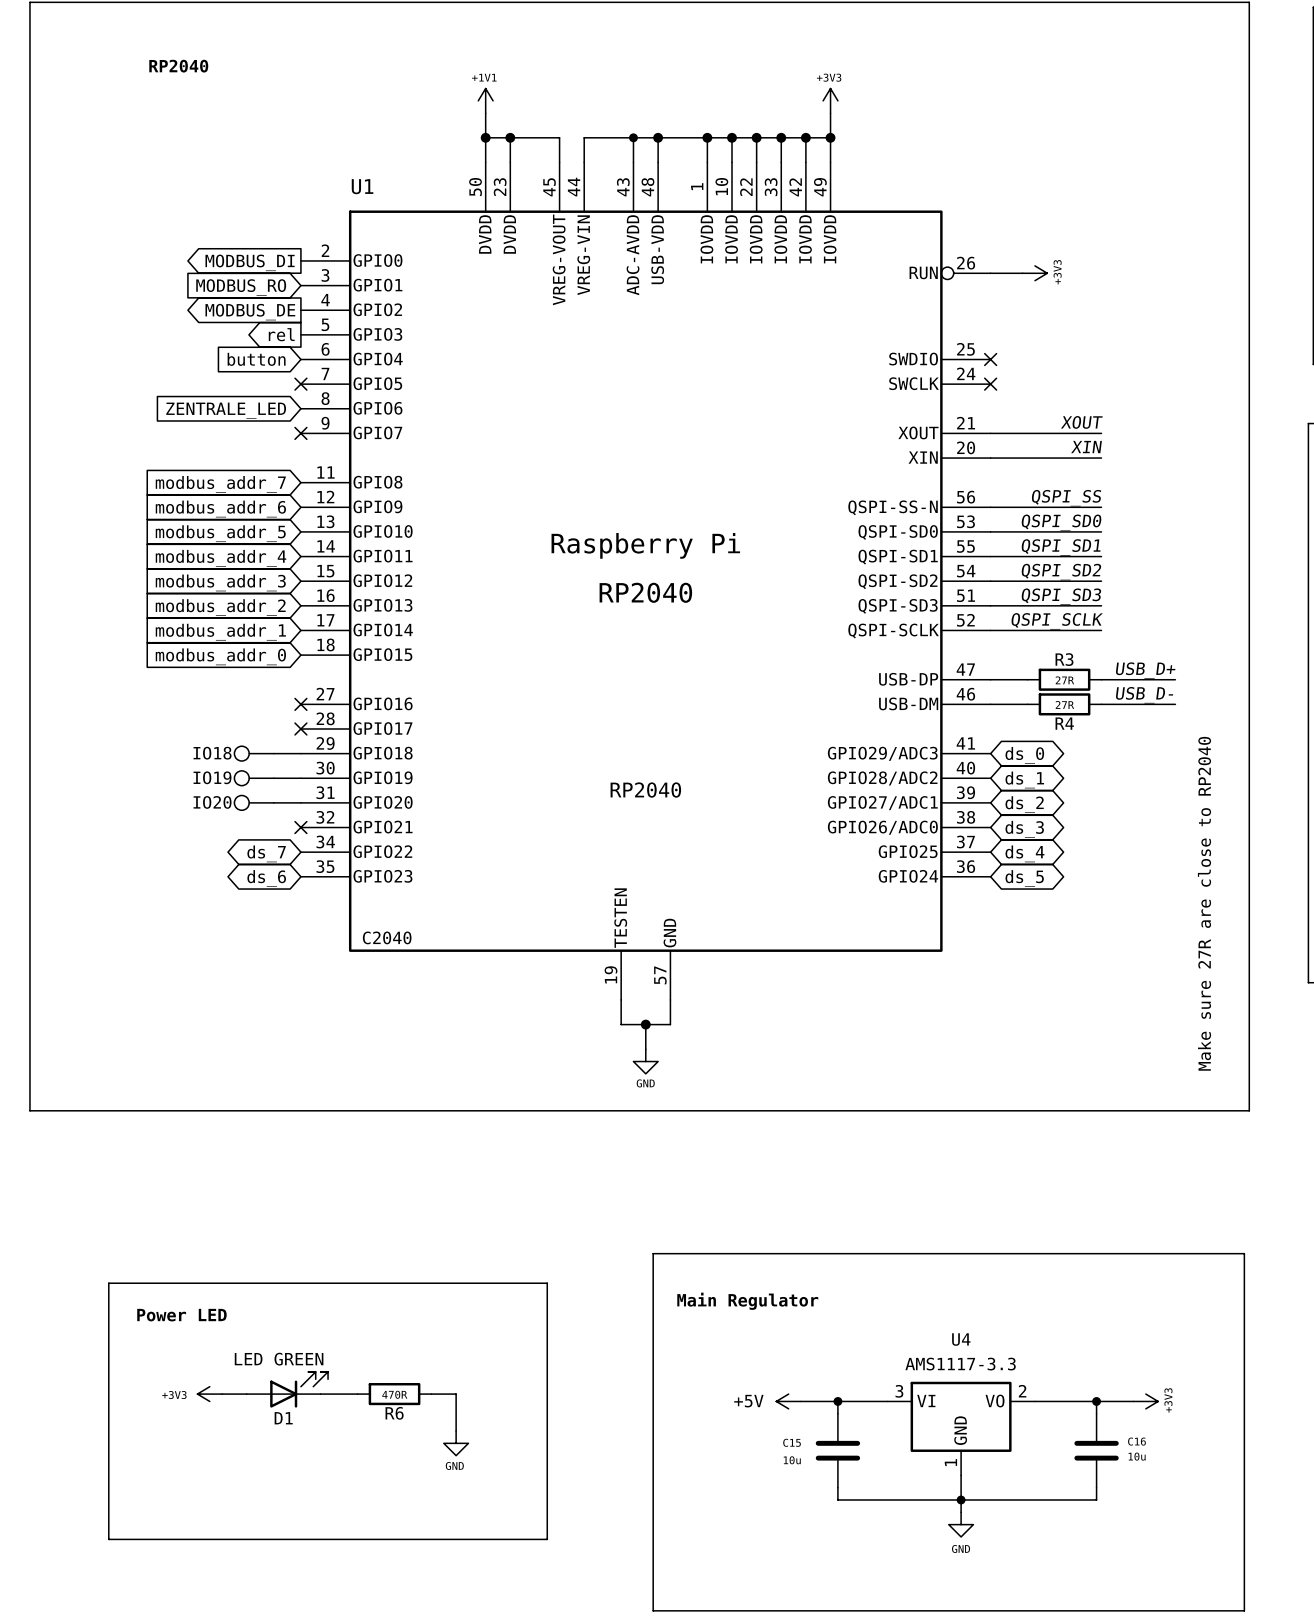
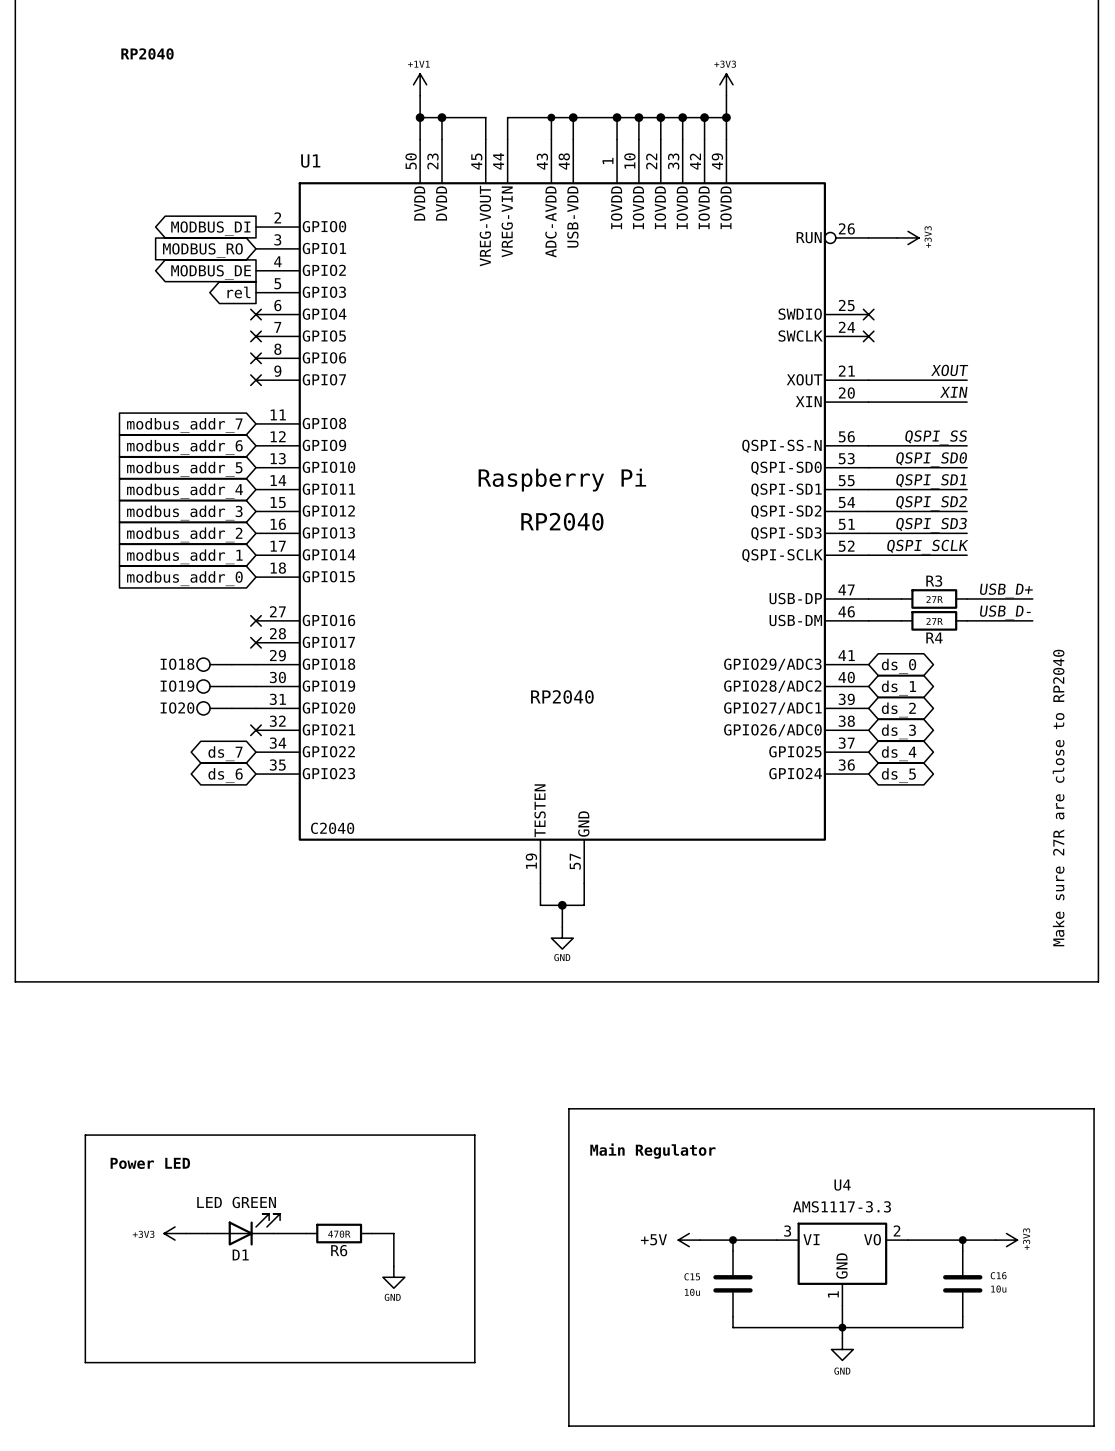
global label: button (256, 359) -> none
no-connect mark: none -> (256, 314)
no-connect mark: none -> (256, 358)
global label: ZENTRALE_LED (226, 410) -> none

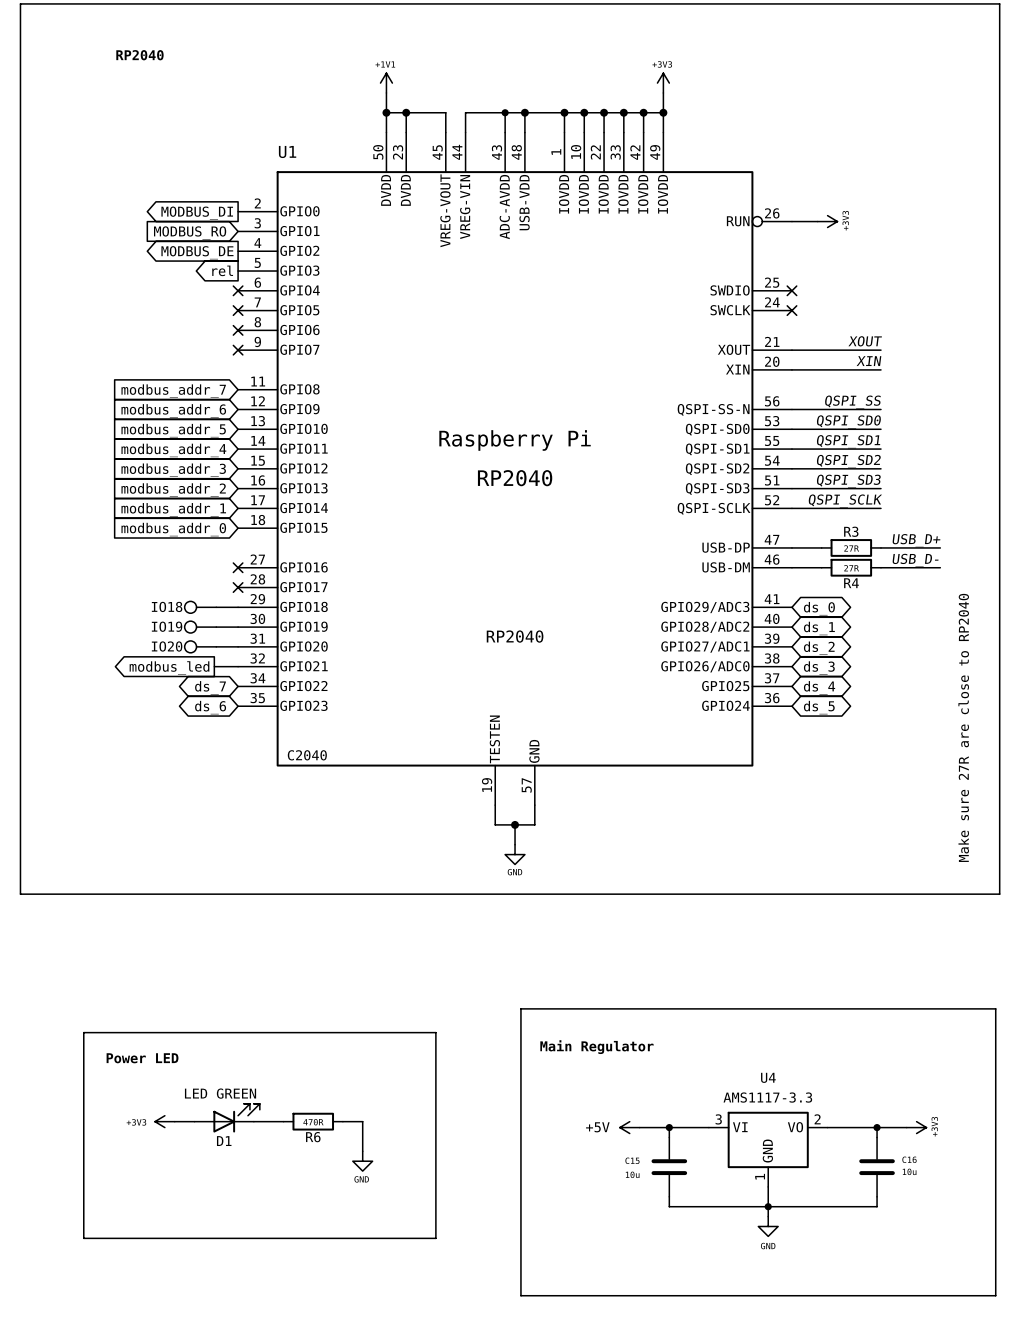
wire: none -> (214, 666) (238, 666)
no-connect mark: (256, 730) -> none
global label: none -> modbus_led (169, 668)

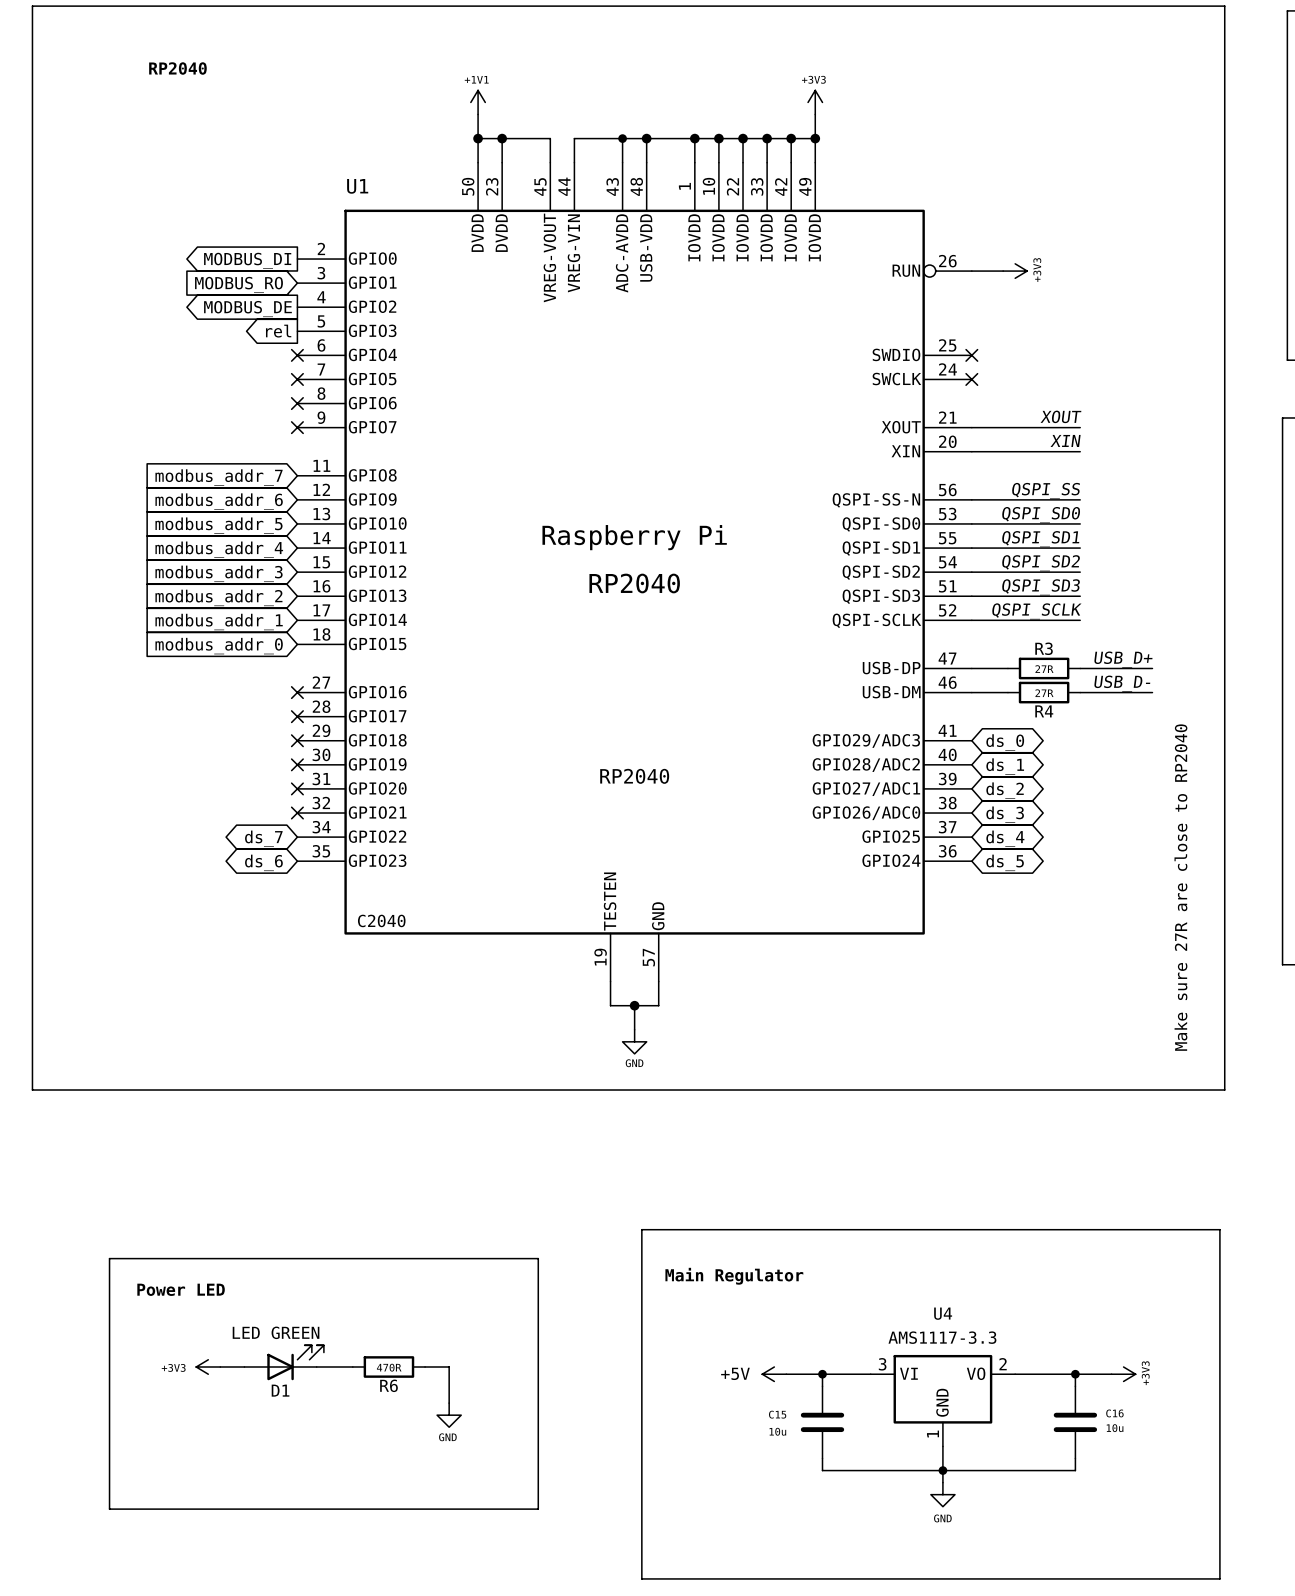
IO18: (200, 607) -> none
wire: (216, 607) (238, 607) -> none
no-connect mark: none -> (297, 740)
IO19: (200, 627) -> none
wire: (216, 627) (238, 627) -> none
no-connect mark: none -> (297, 764)
IO20: (200, 646) -> none
wire: (216, 646) (238, 646) -> none
no-connect mark: none -> (297, 788)
wire: (214, 666) (238, 666) -> none
no-connect mark: none -> (297, 813)
global label: modbus_led (169, 668) -> none

